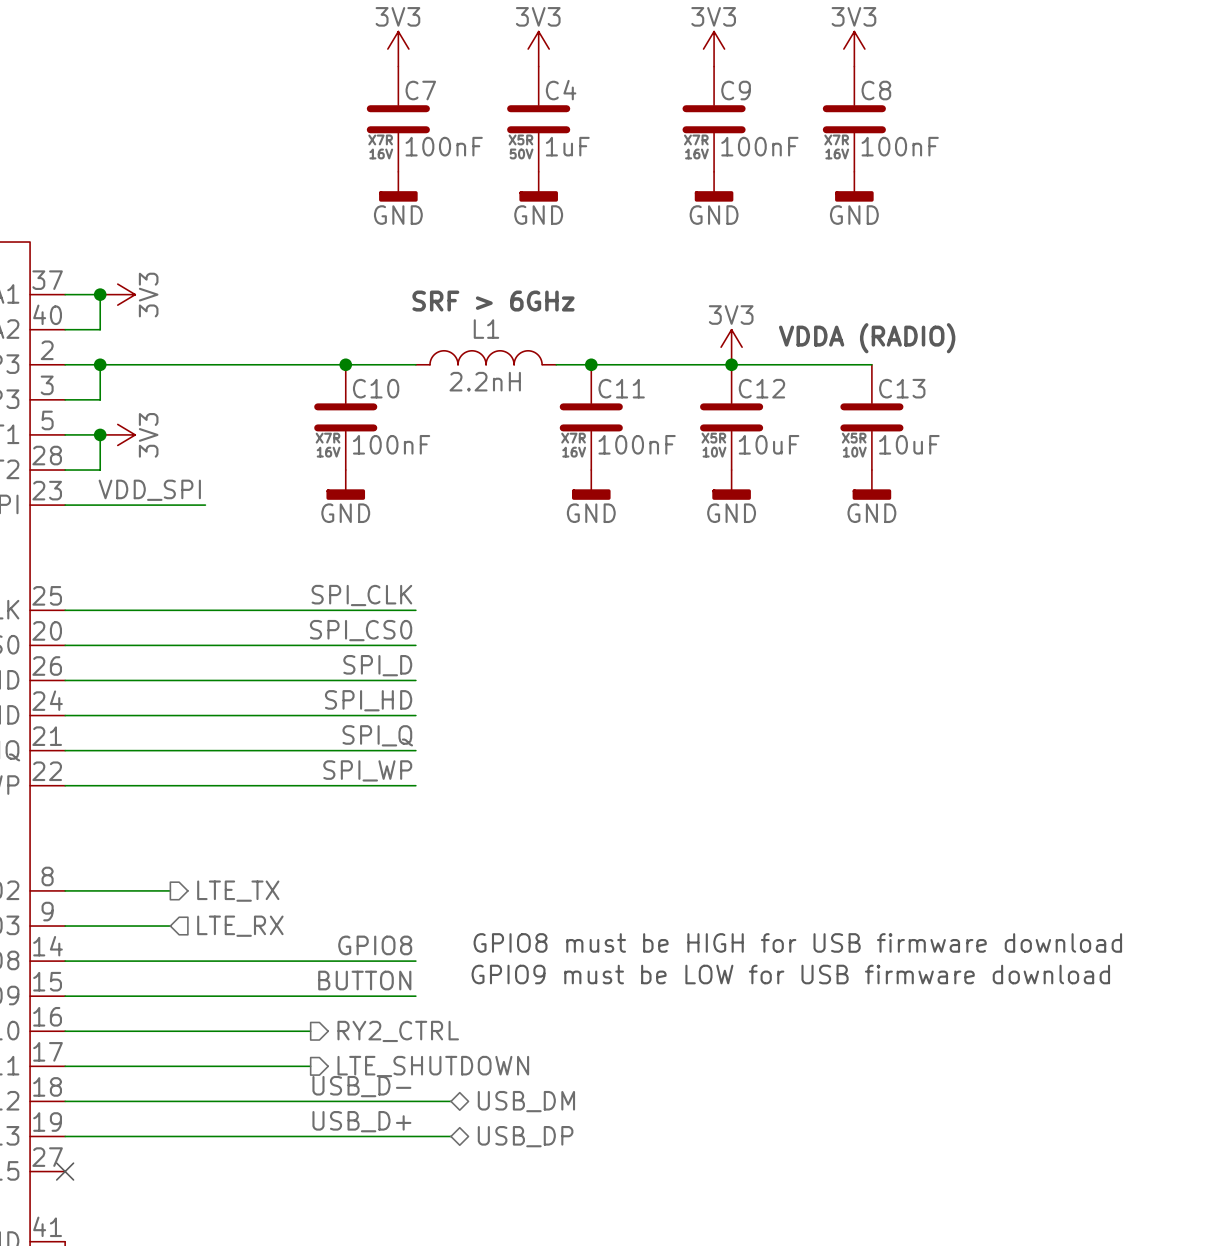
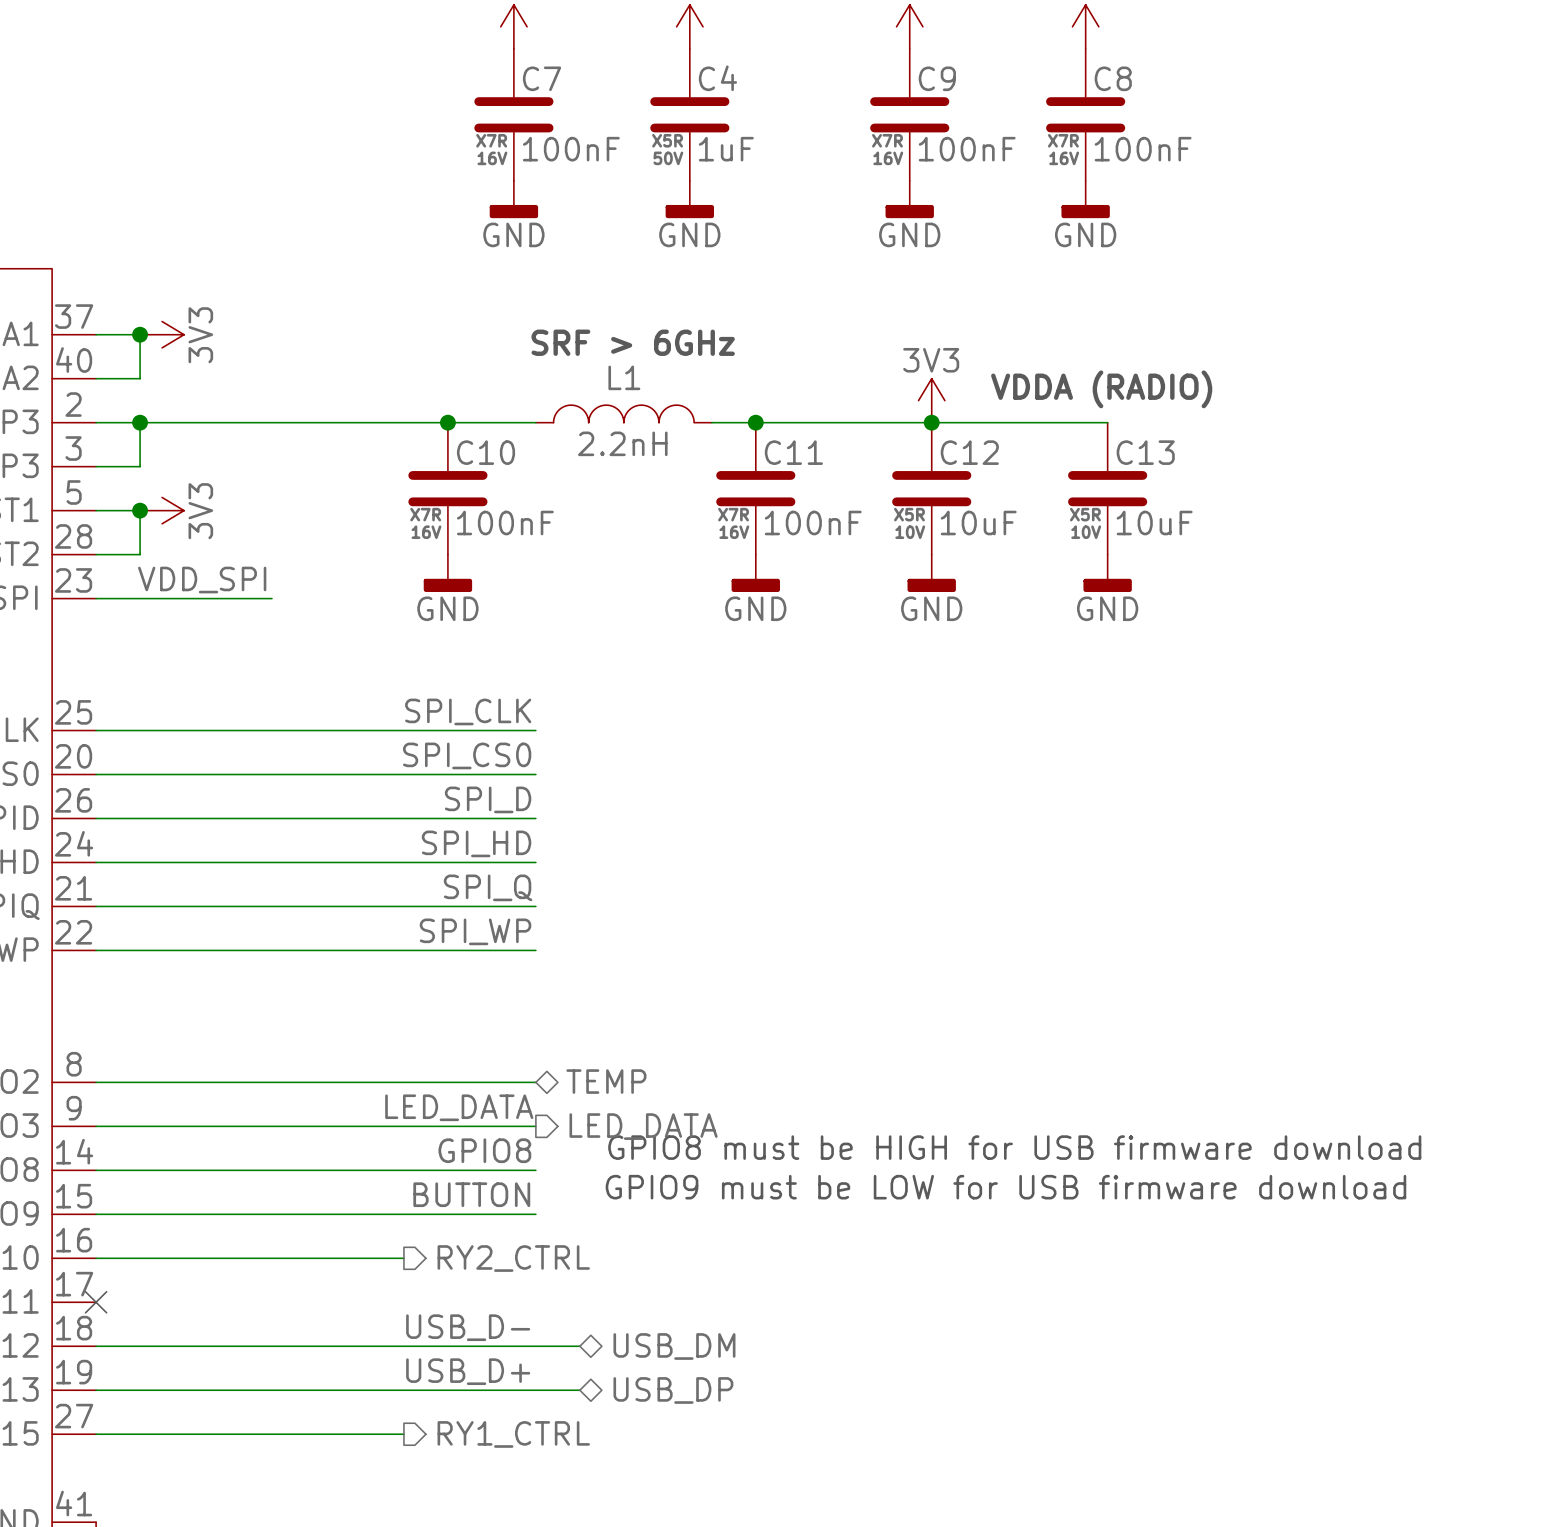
wire: none -> (228, 1082) (535, 1082)
hierarchical label: none -> TEMP (606, 1081)
hierarchical label: LTE_TX (238, 891) -> none
label: none -> LED_DATA (459, 1107)
wire: none -> (228, 1126) (535, 1126)
hierarchical label: LTE_RX (240, 926) -> none
hierarchical label: none -> LED_DATA (643, 1126)
wire: (65, 1066) (310, 1066) -> (96, 1434) (403, 1434)
no-connect mark: none -> (96, 1302)
hierarchical label: LTE_SHUTDOWN (433, 1066) -> none
no-connect mark: (65, 1171) -> none
hierarchical label: none -> RY1_CTRL (513, 1434)

